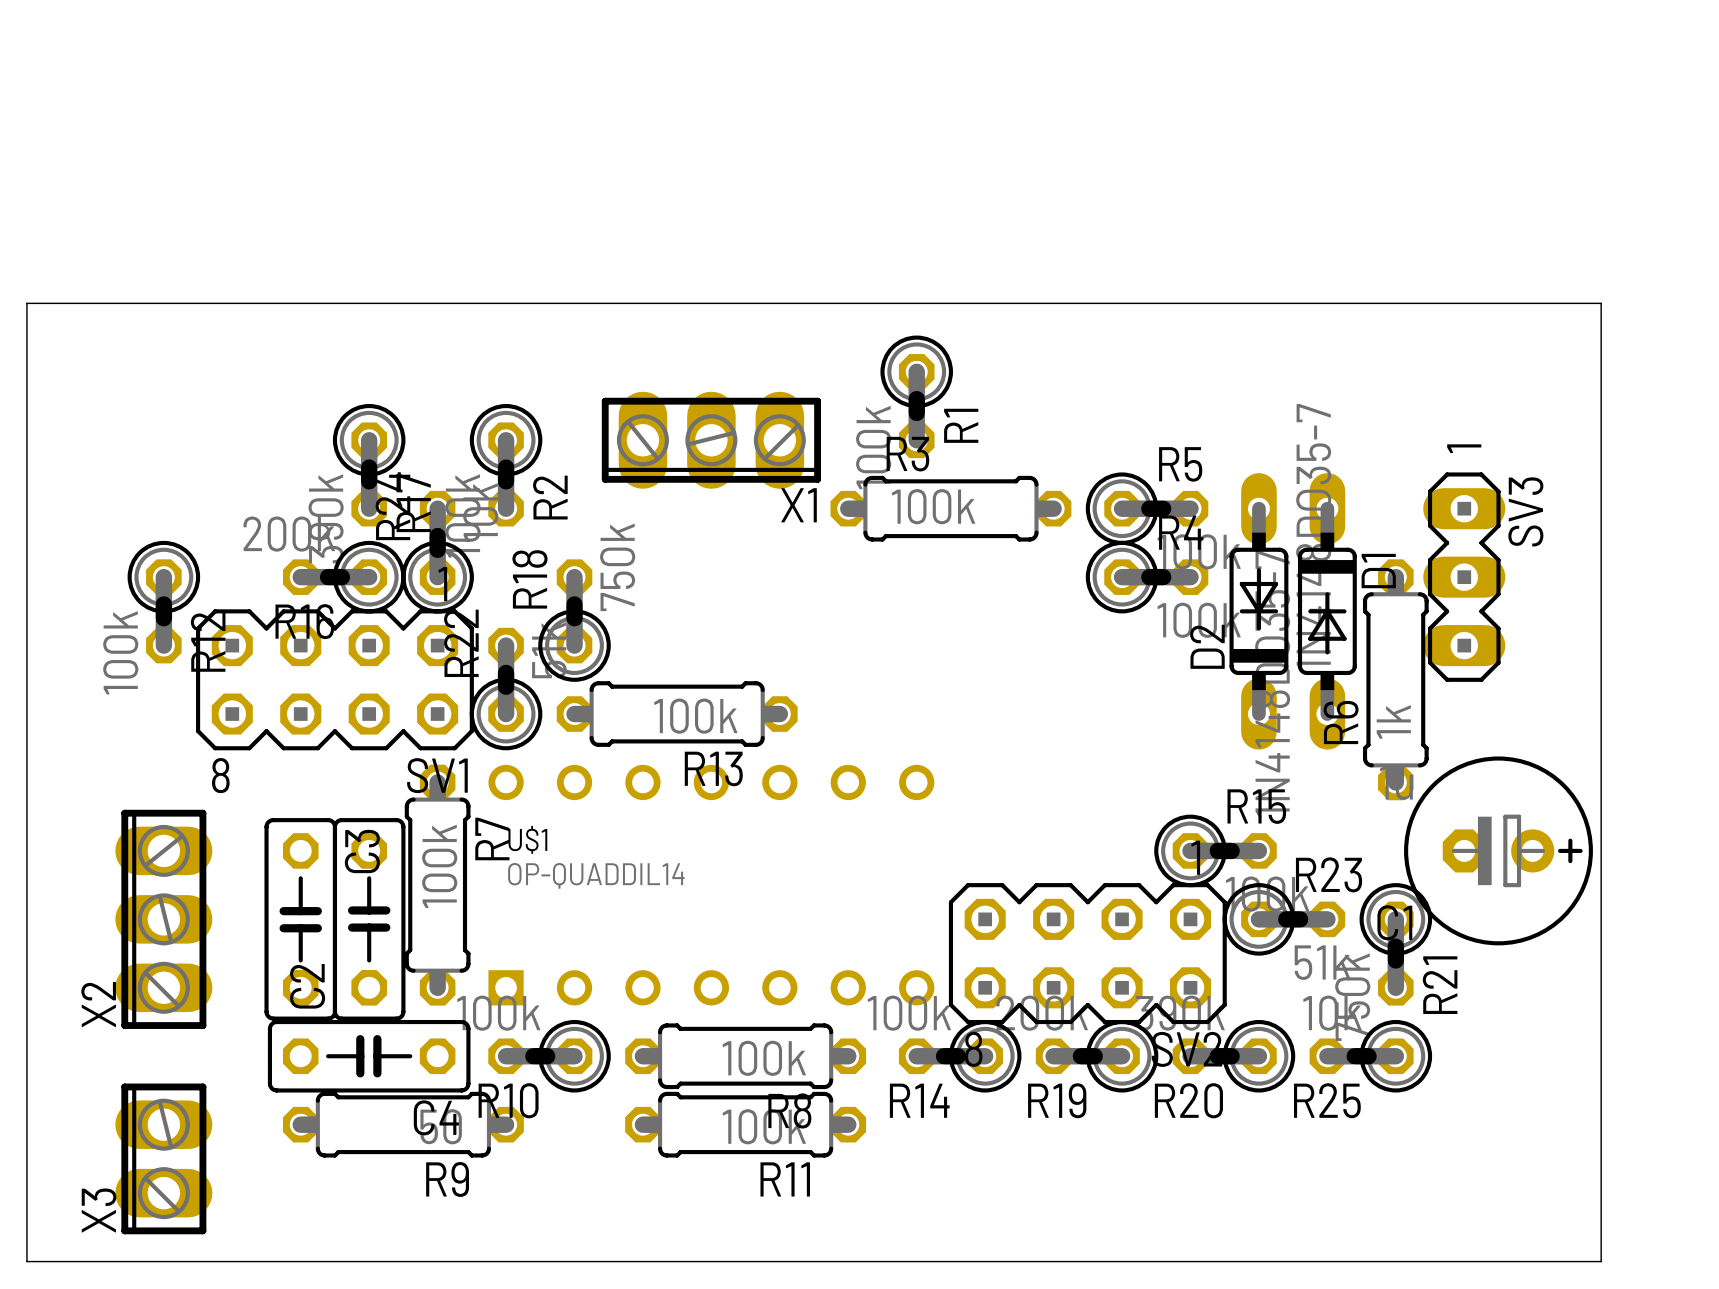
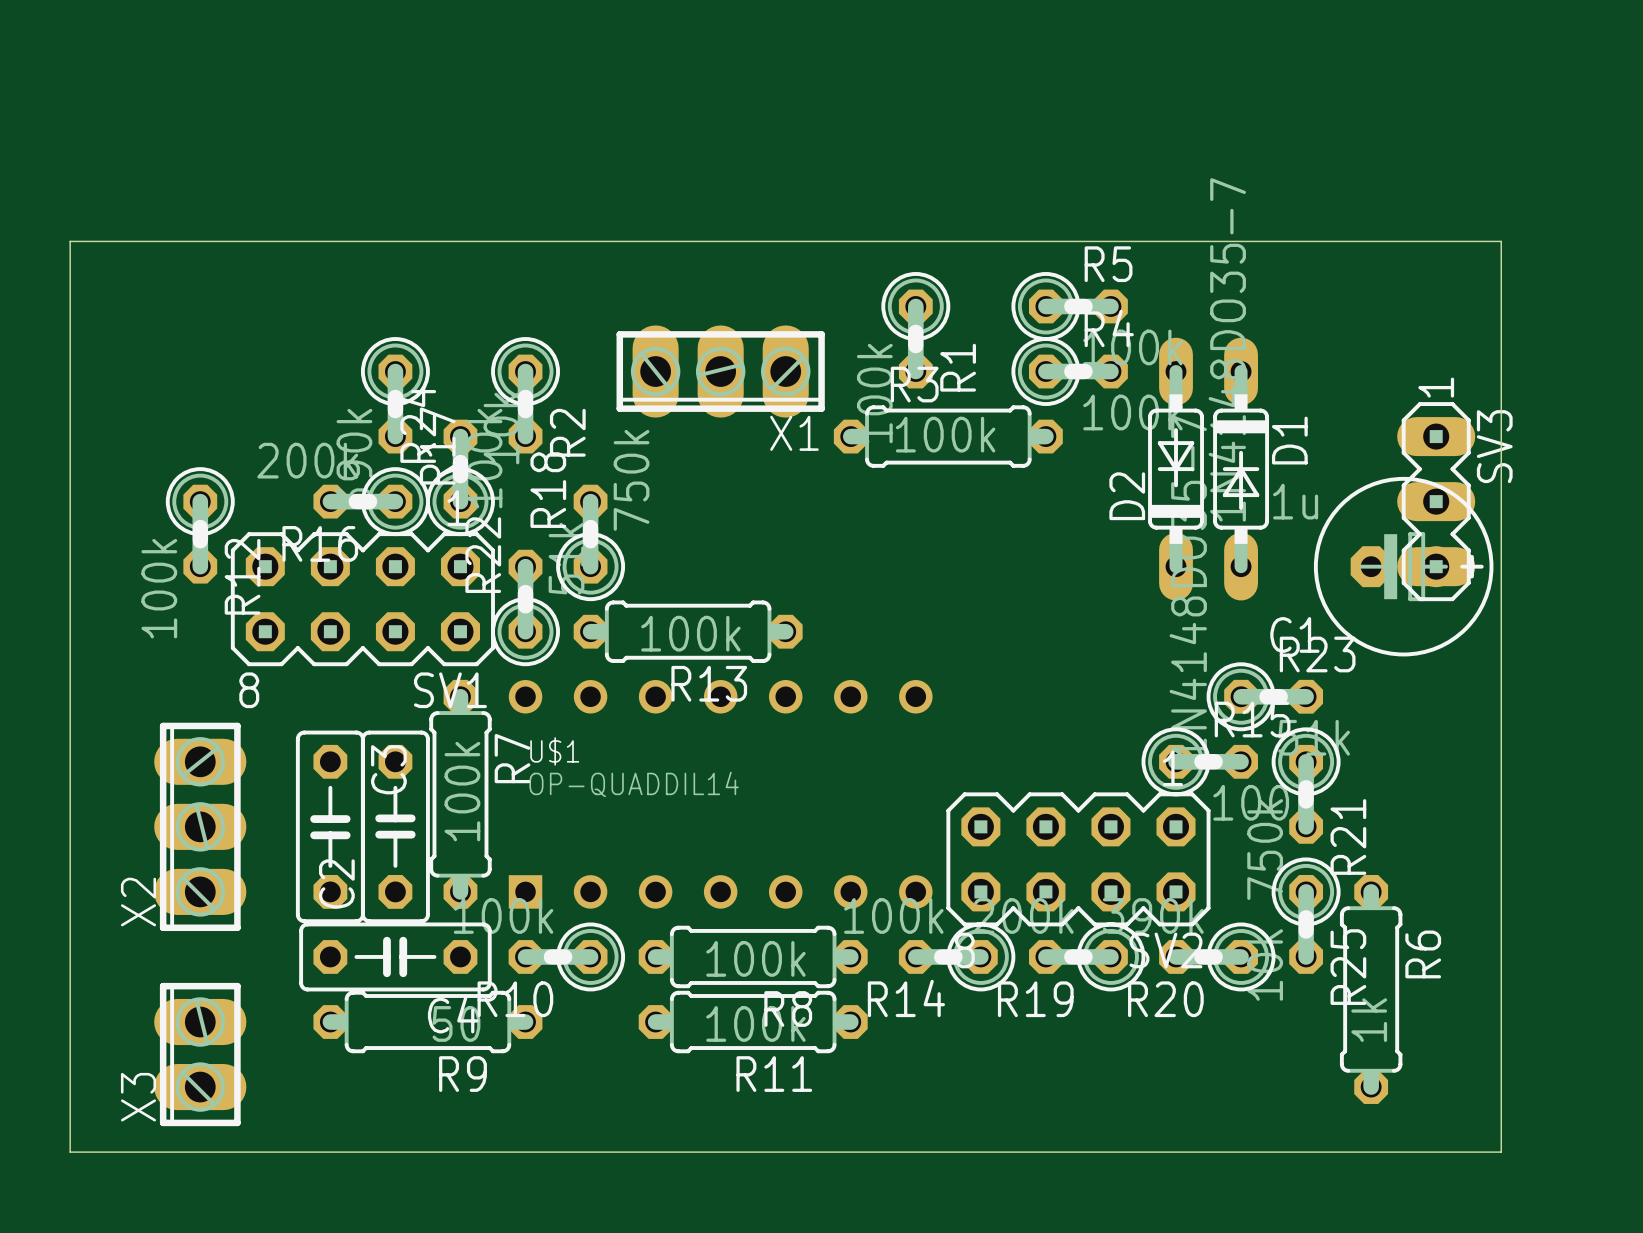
board edge: (1532, 303) (1601, 303) (1601, 1261) (1532, 1261) -> (1501, 241) (1501, 1152)
R5 position: (1147, 508) -> (1069, 306)
R4 position: (1147, 577) -> (1069, 371)
D2 position: (1258, 611) -> (1176, 469)
D1 position: (1327, 611) -> (1241, 469)
R6 position: (1395, 679) -> (1371, 989)
R6 name position: R6 (1341, 722) -> R6 (1423, 954)
C1 position: (1498, 850) -> (1403, 566)
R23 position: (1283, 919) -> (1264, 696)
R21 position: (1395, 944) -> (1306, 785)
R25 rotation: 0° (1370, 1056) -> 90° counterclockwise (1306, 915)

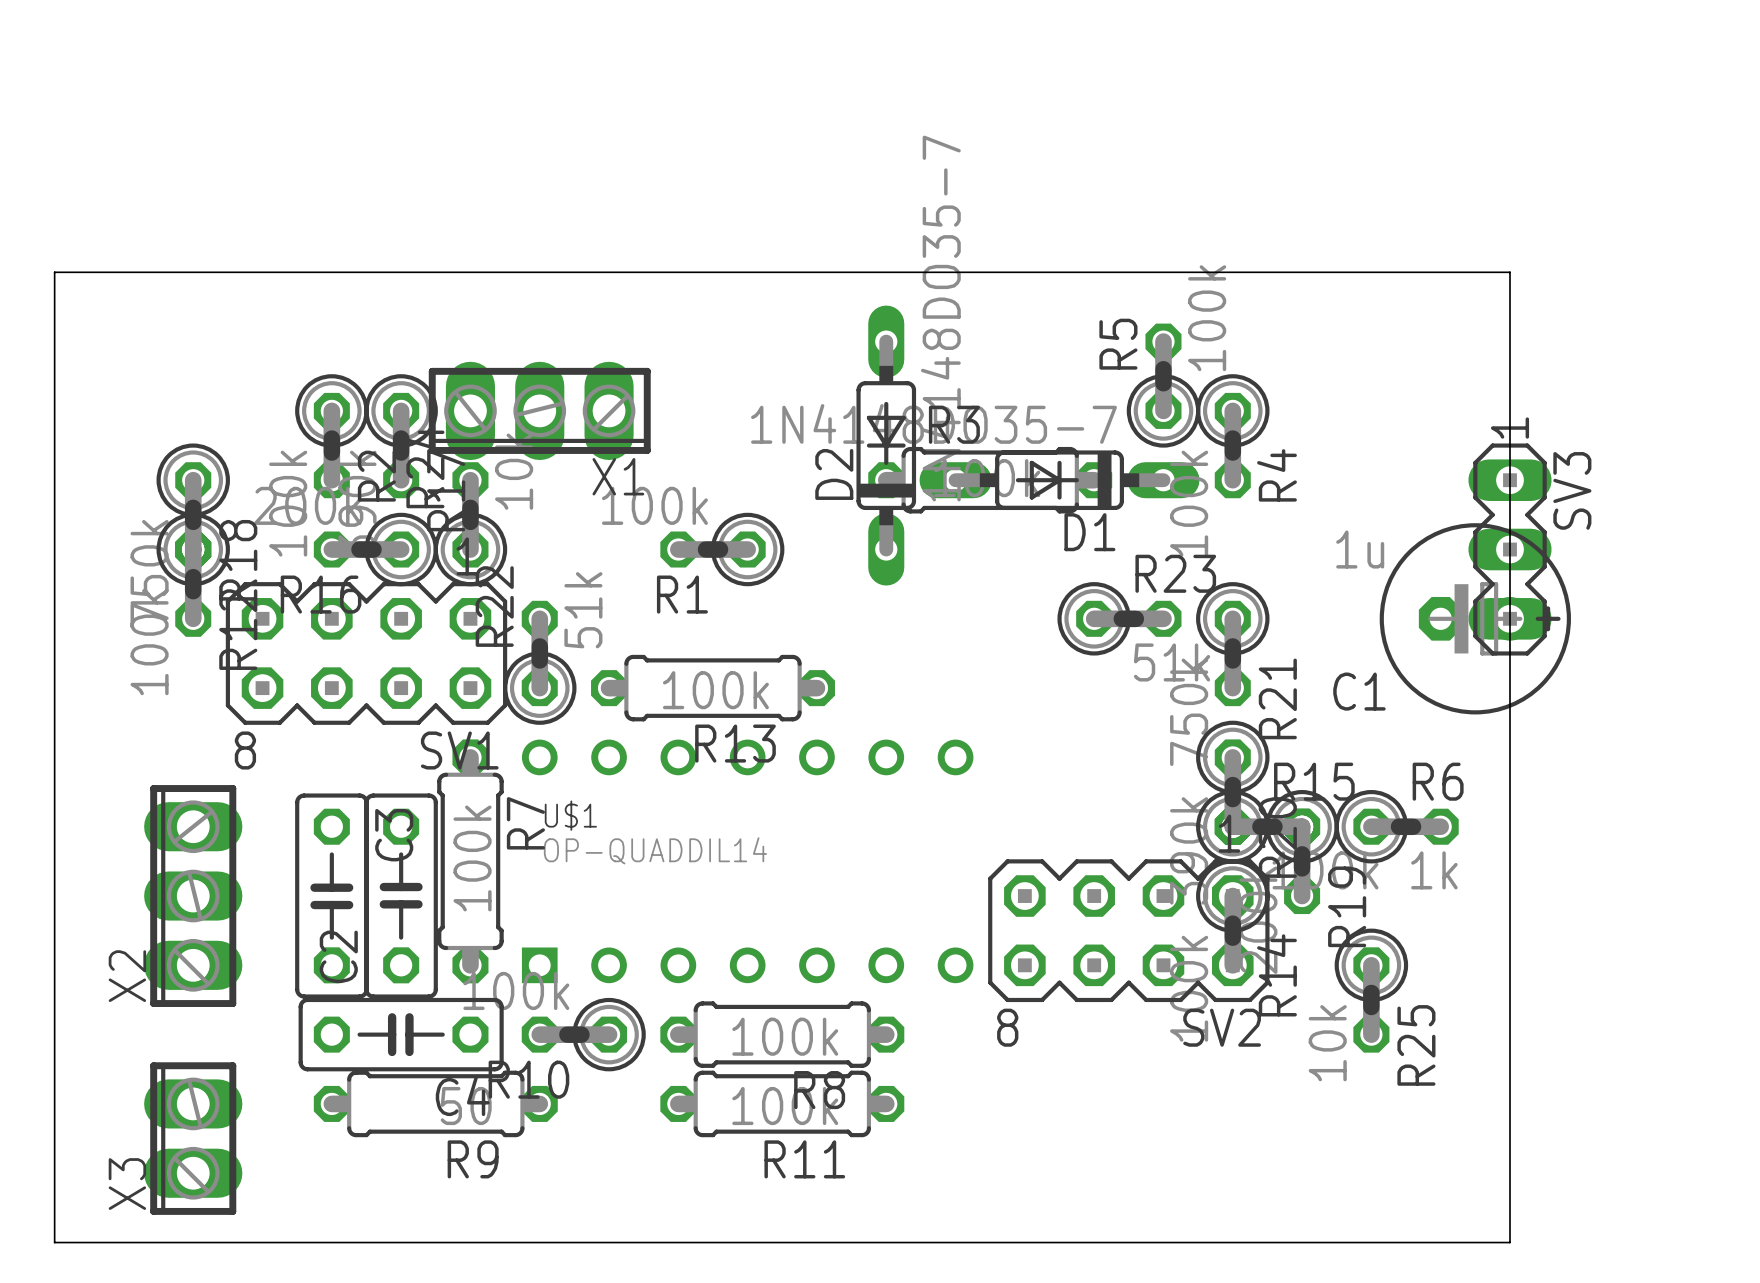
board edge: (1436, 241) (1501, 241) (1501, 1152) (1436, 1152) -> (1509, 272) (1509, 1242)
R5 rotation: 0° (1069, 306) -> 90° counterclockwise (1163, 385)
R1 rotation: 0° (915, 330) -> 90° clockwise (722, 549)
R1 position: (915, 330) -> (722, 549)
X1 position: (720, 371) -> (539, 410)
R4 rotation: 0° (1069, 371) -> 90° clockwise (1232, 436)
R4 position: (1069, 371) -> (1232, 436)
R2 position: (525, 395) -> (331, 436)
D2 position: (1176, 469) -> (886, 445)
D1 rotation: 0° (1241, 469) -> 90° clockwise (1059, 480)
D1 position: (1241, 469) -> (1059, 480)
R18 rotation: 0° (590, 542) -> 180° (193, 505)
R18 position: (590, 542) -> (193, 505)
R23 position: (1264, 696) -> (1119, 618)
R21 position: (1306, 785) -> (1232, 644)
R6 footprint: [1339, 875, 1403, 1104] -> [1334, 789, 1459, 864]
R14 rotation: 0° (957, 956) -> 90° counterclockwise (1232, 921)
R14 position: (957, 956) -> (1232, 921)
R19 rotation: 0° (1087, 956) -> 90° counterclockwise (1302, 852)
R19 position: (1087, 956) -> (1302, 852)
R20 rotation: 0° (1217, 956) -> 90° counterclockwise (1232, 782)
R20 position: (1217, 956) -> (1232, 782)

